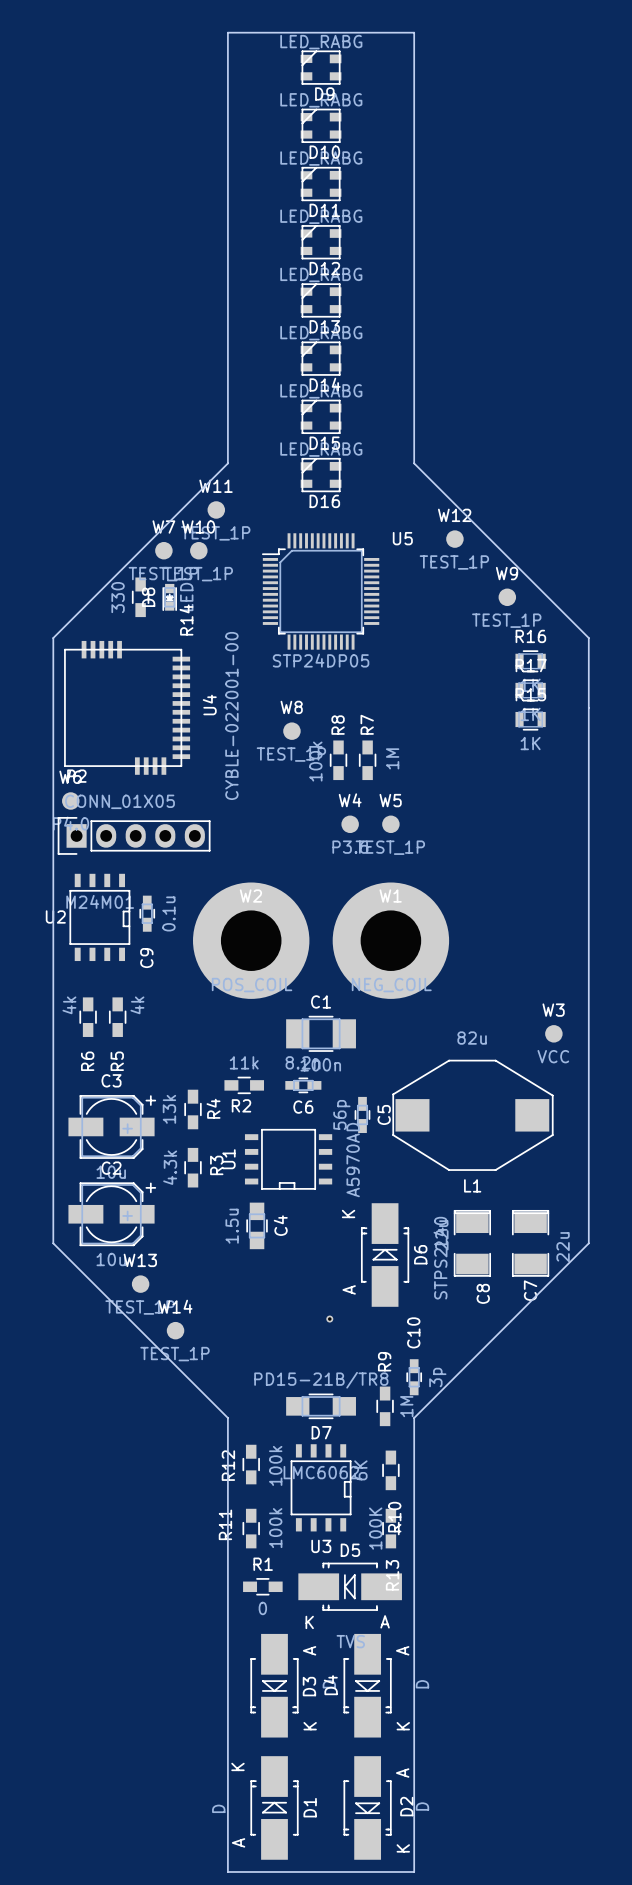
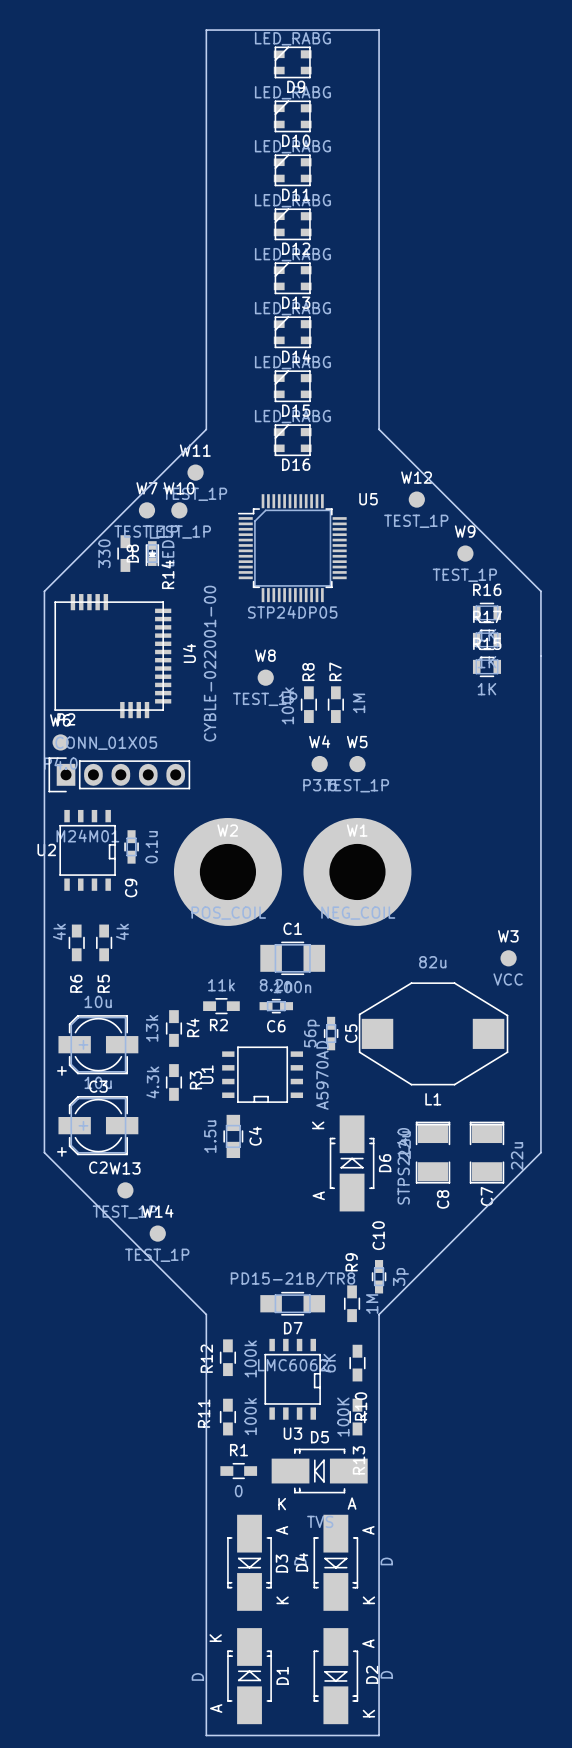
C3 rotation: 0° (111, 1126) -> 180° (98, 1044)
C2 rotation: 0° (111, 1214) -> 180° (98, 1125)
part: (329, 1319) -> none

